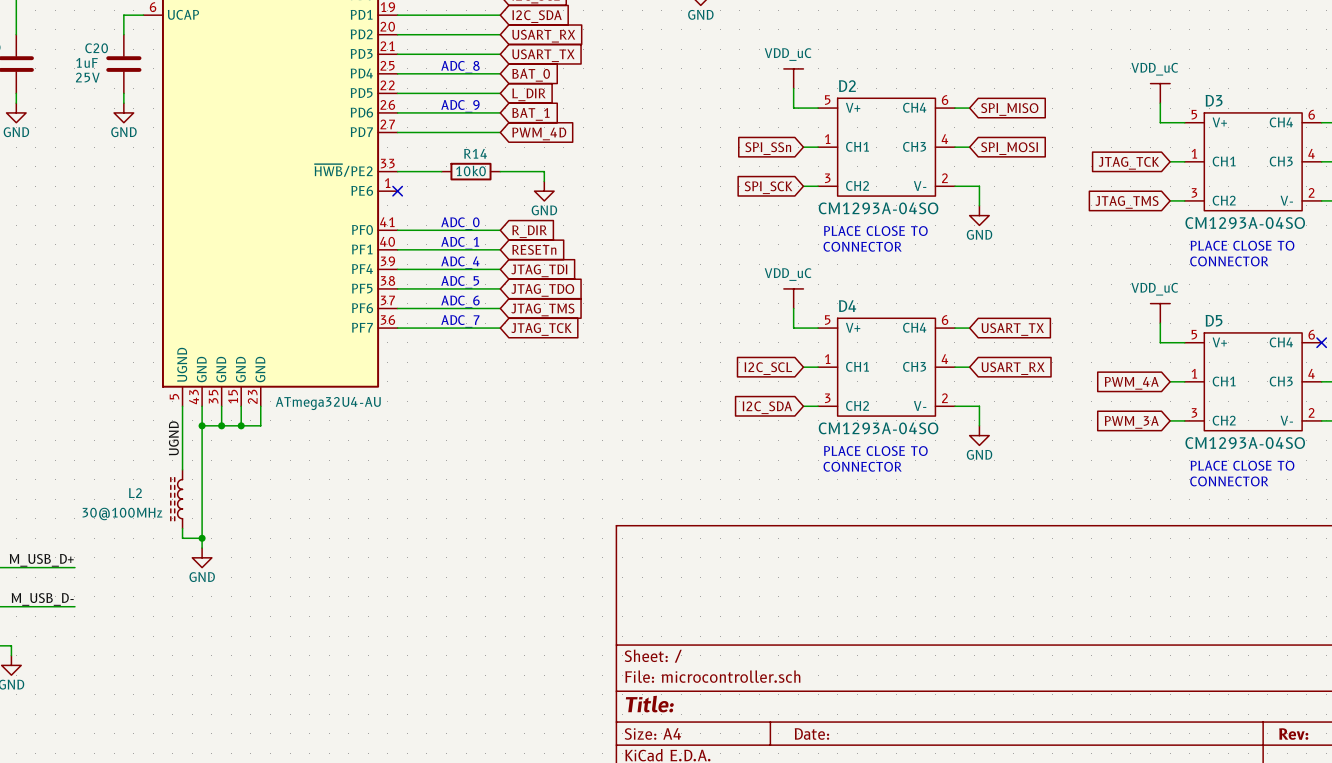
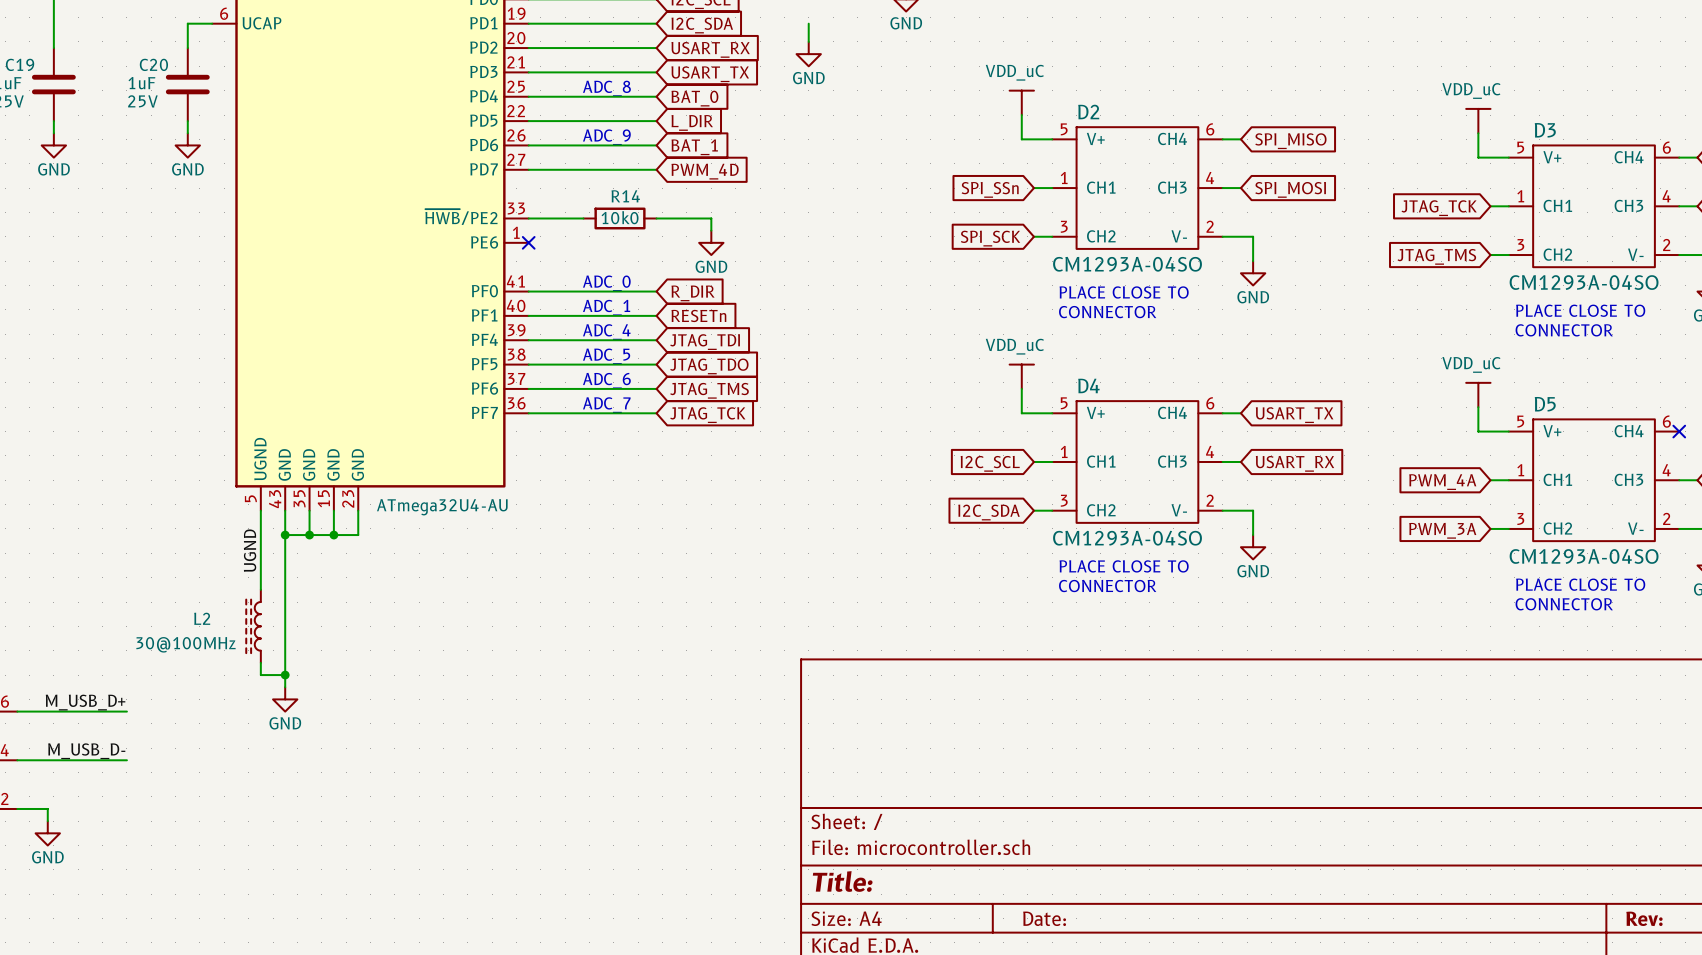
wire: none -> (808, 23) (808, 41)
power symbol: none -> GND (808, 54)

